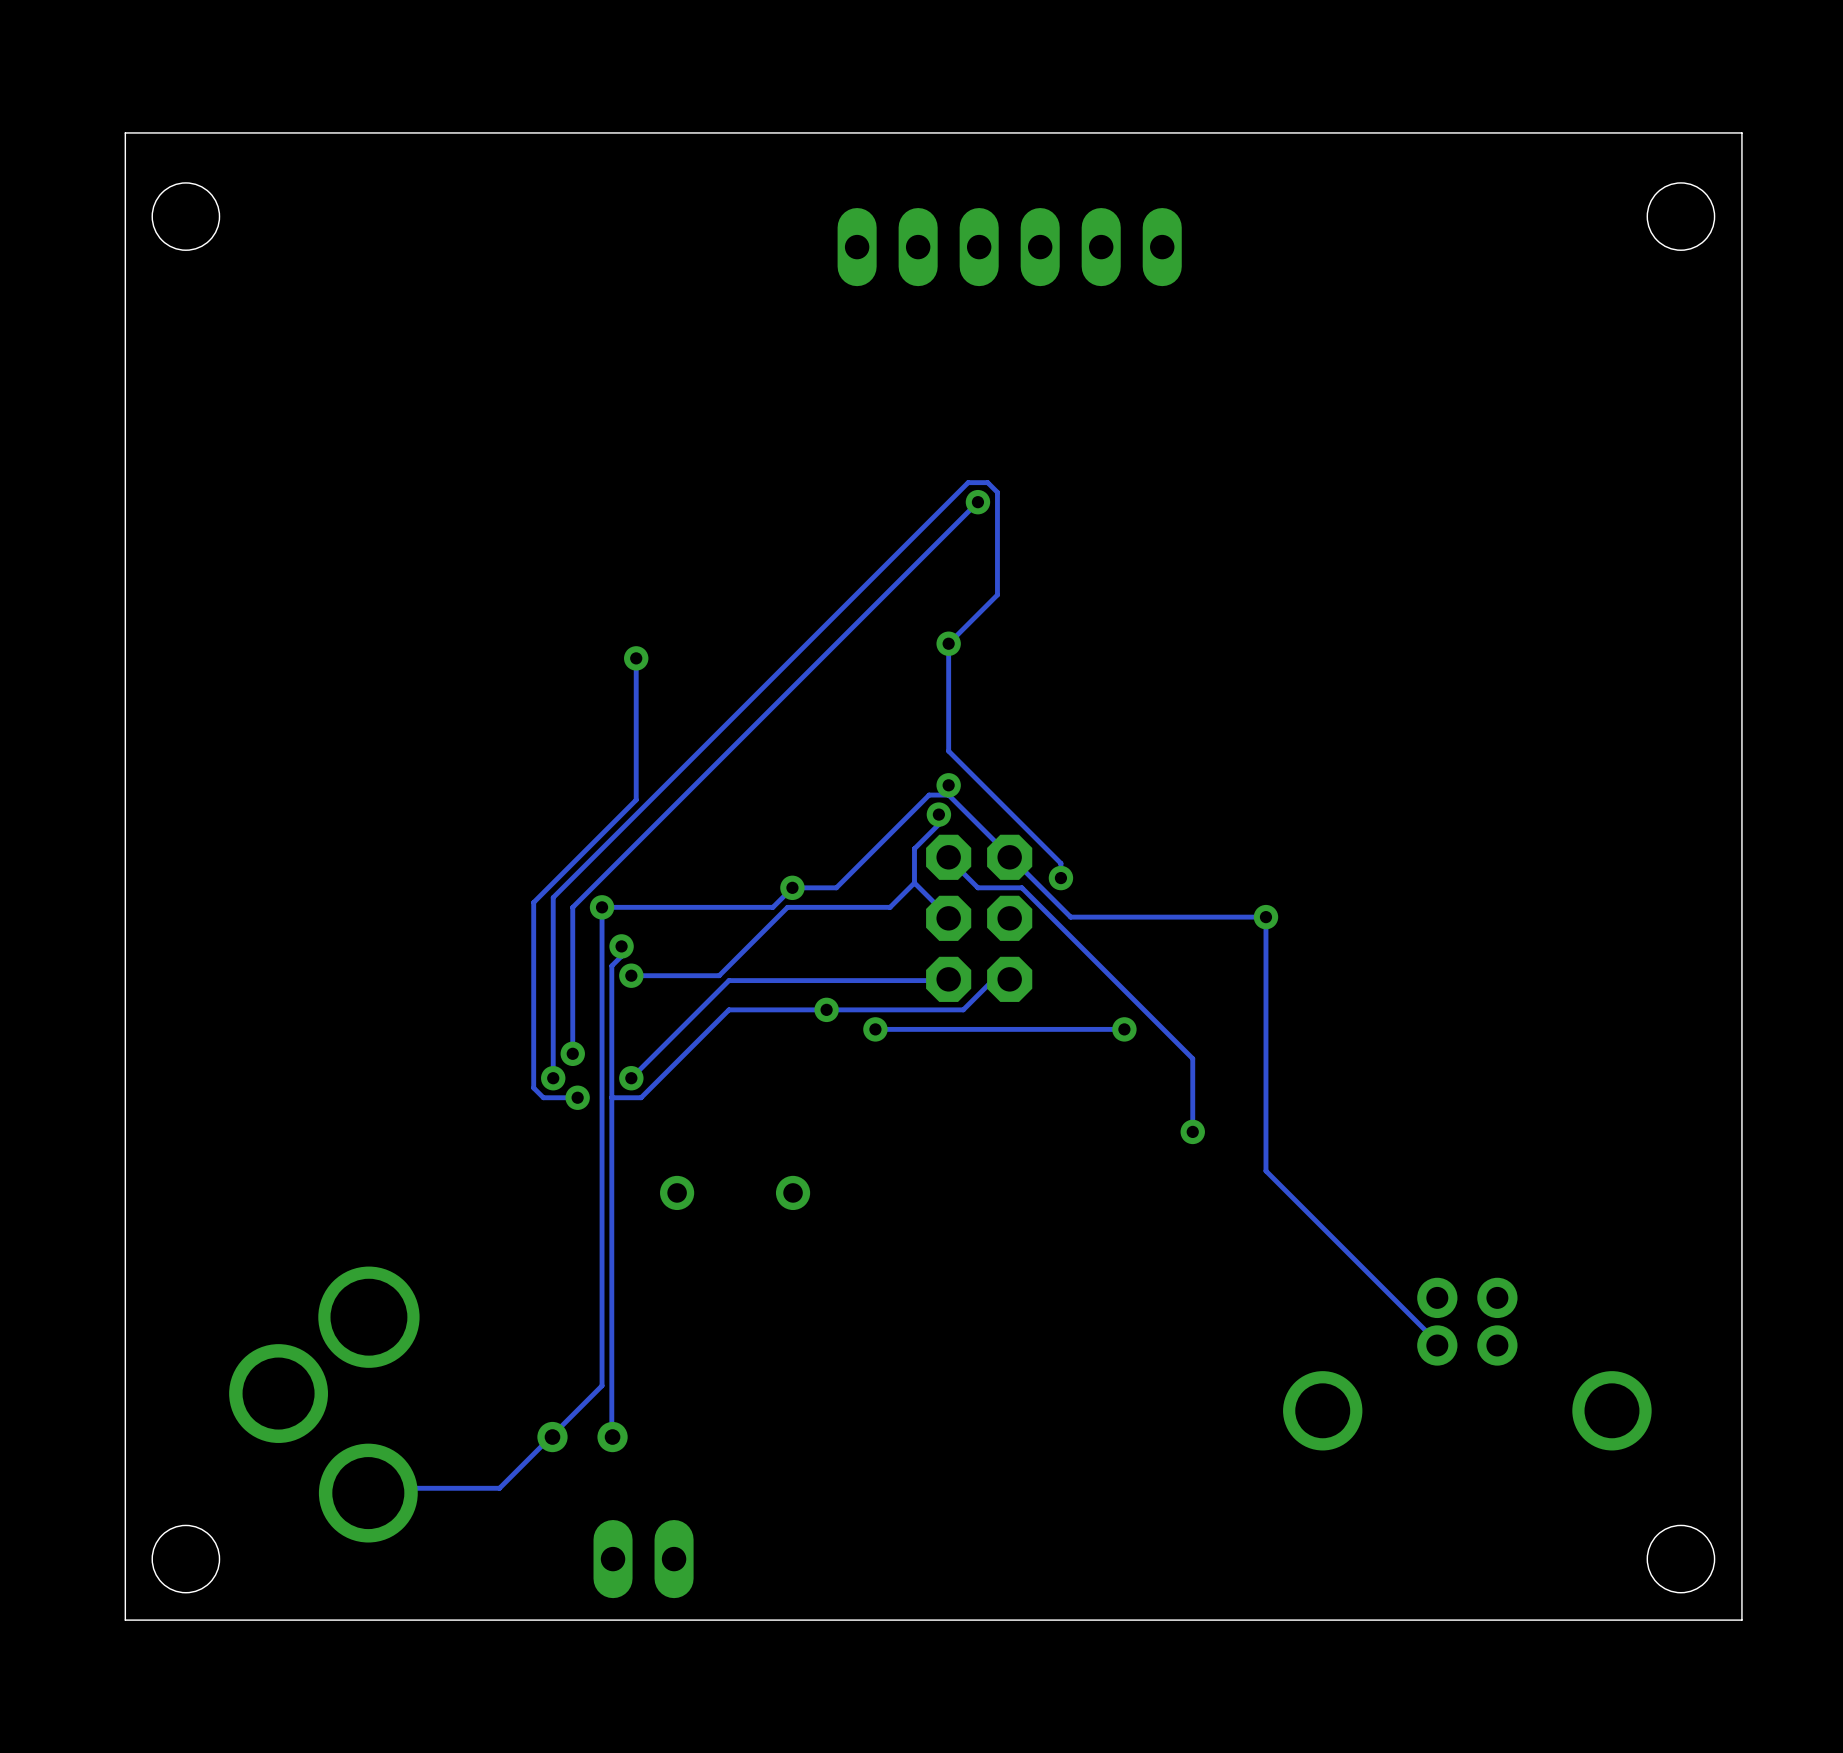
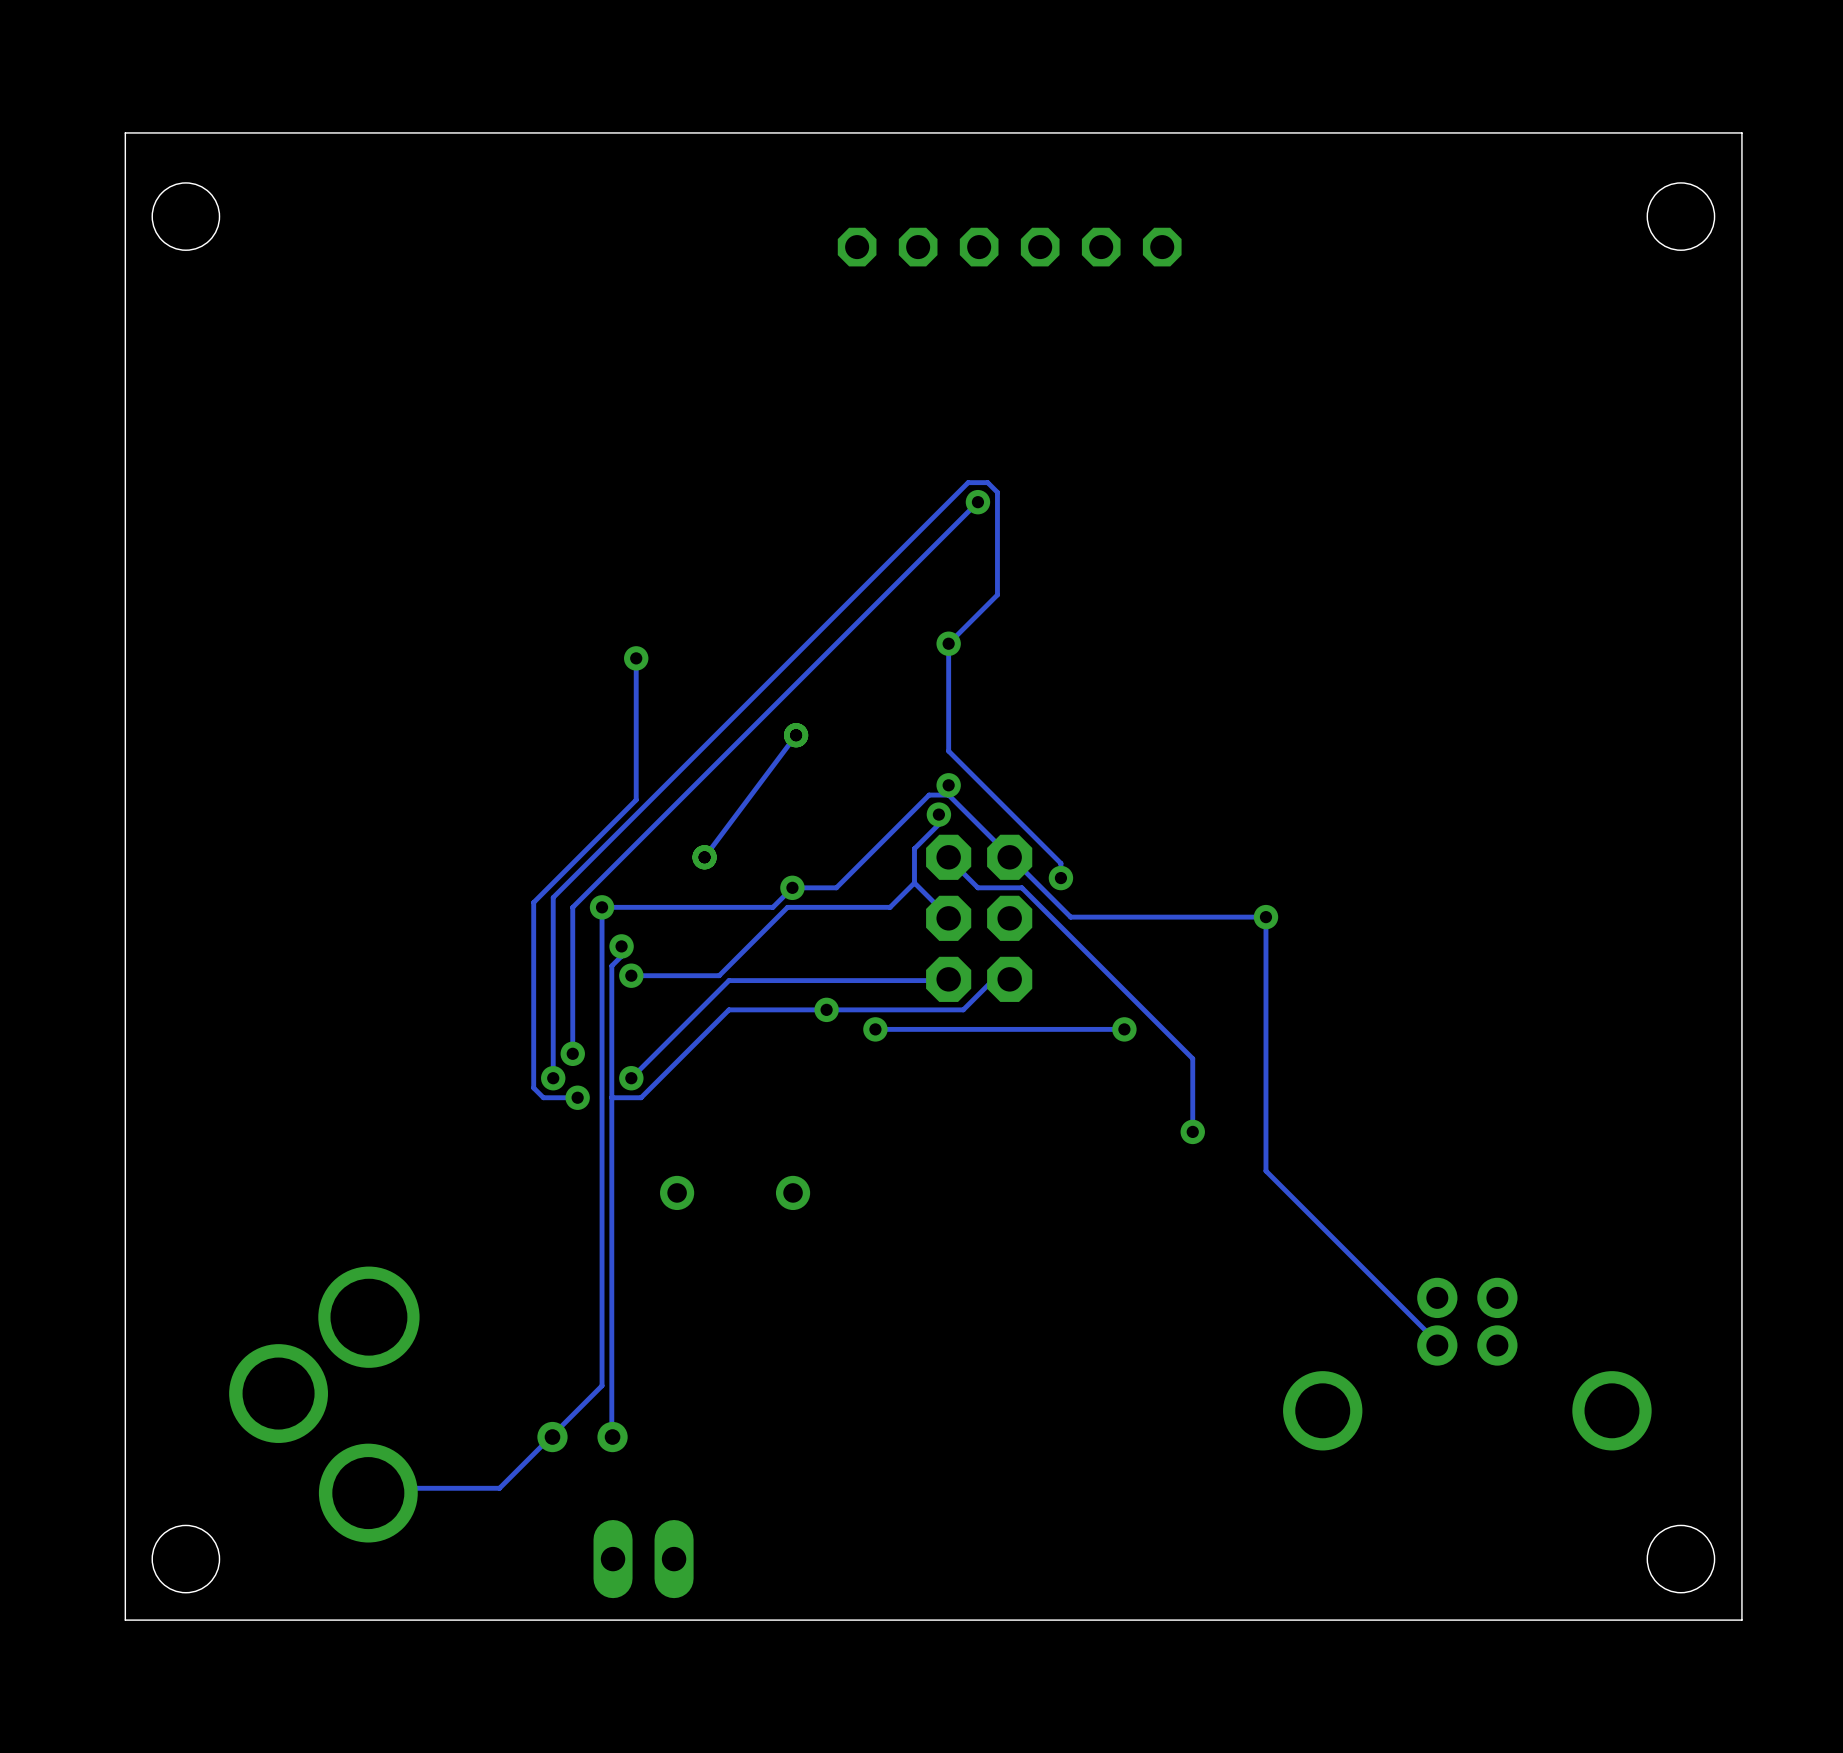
part footprint: [837, 208, 1182, 287] -> [837, 227, 1182, 267]
track: none -> (796, 735) (704, 857)
via: none -> (796, 735)
via: none -> (704, 857)

